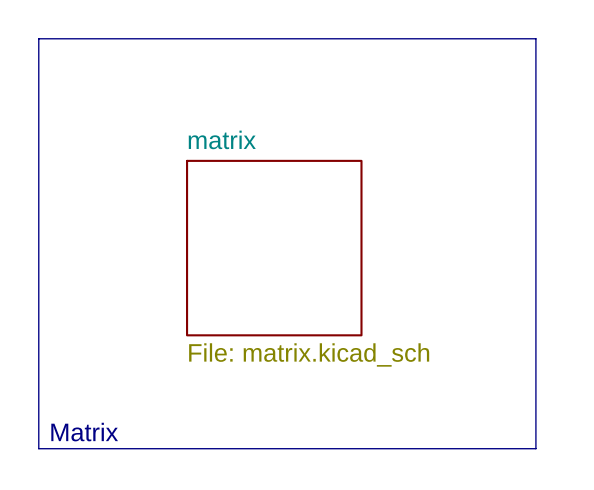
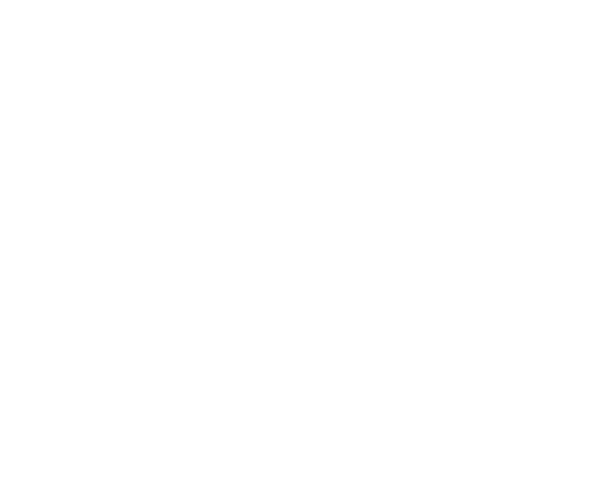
line: (38, 38) (535, 38) (535, 448) (38, 448) (38, 38) -> none
sheet matrix: File: matrix.kicad_sch (274, 248) -> none
text: Matrix (84, 432) -> none

